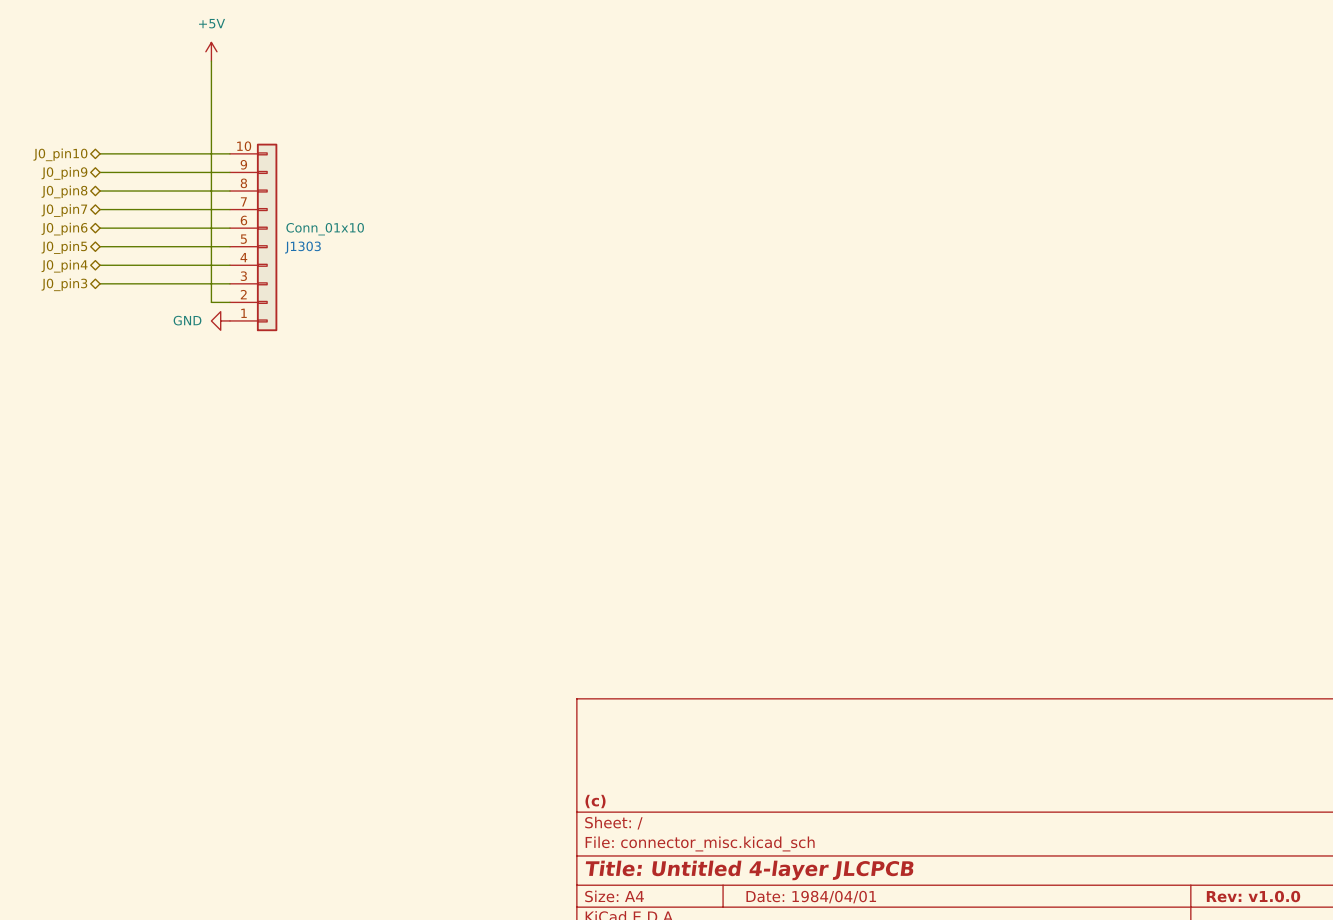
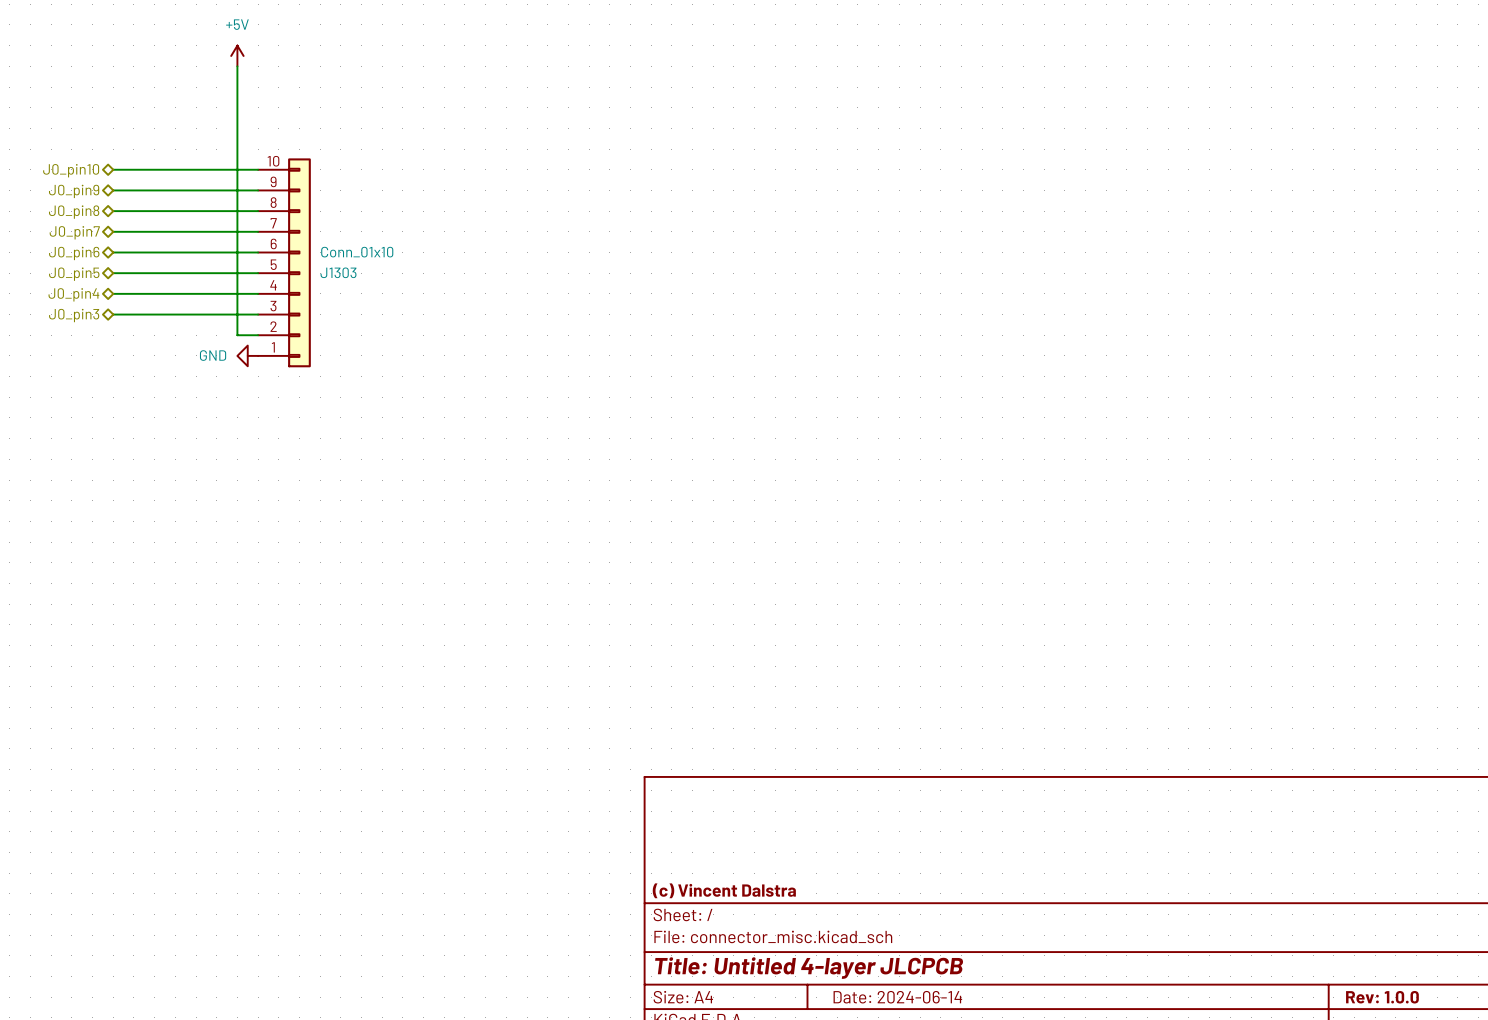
title block: (c) (595, 801) -> (c) Vincent Dalstra (724, 890)
title block: Rev: v1.0.0 (1253, 896) -> Rev: 1.0.0 (1382, 997)
title block: Date: 1984/04/01 (811, 897) -> Date: 2024-06-14 (897, 997)

